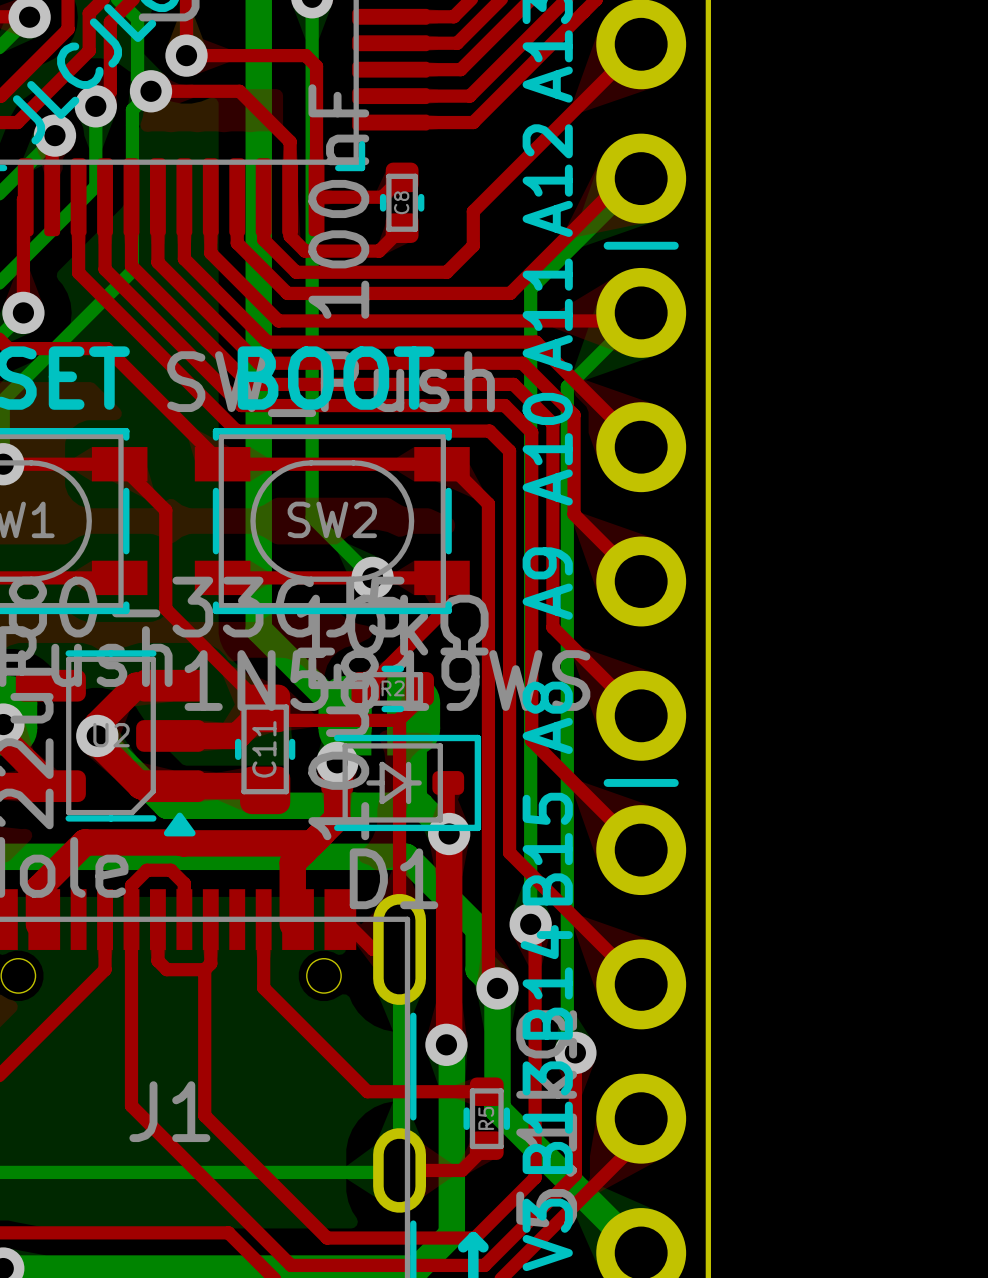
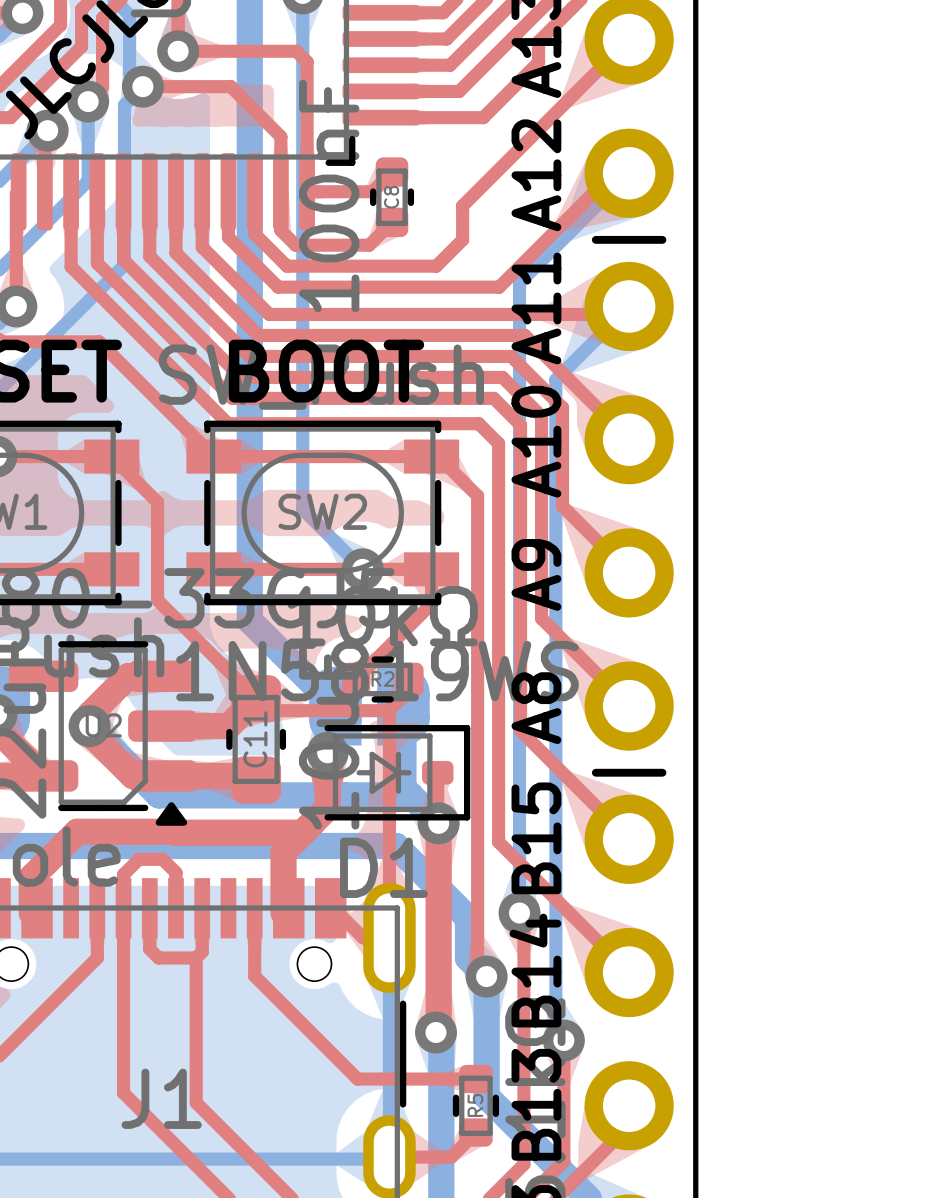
top track: (549, 45) (473, 122) -> (538, 41) (538, 62) (483, 117) (462, 117)

